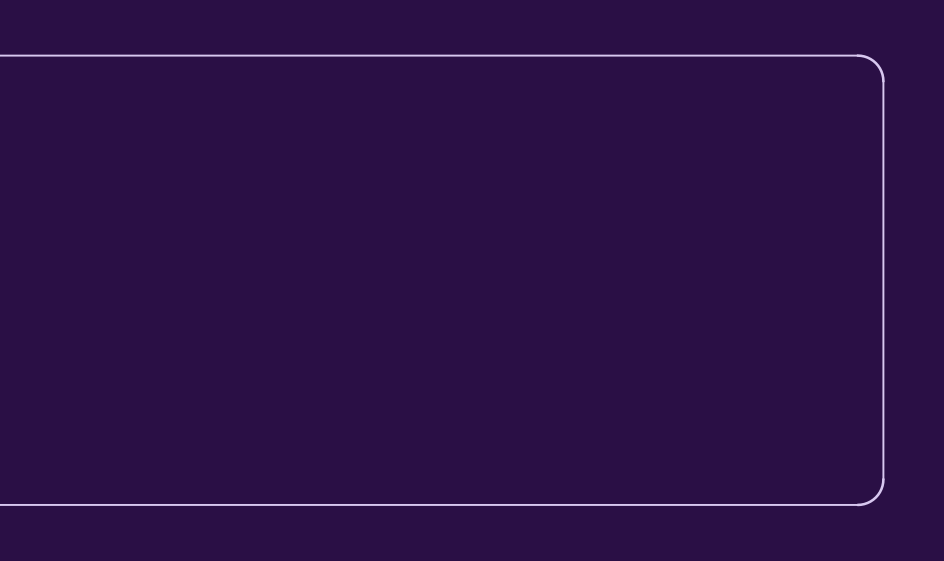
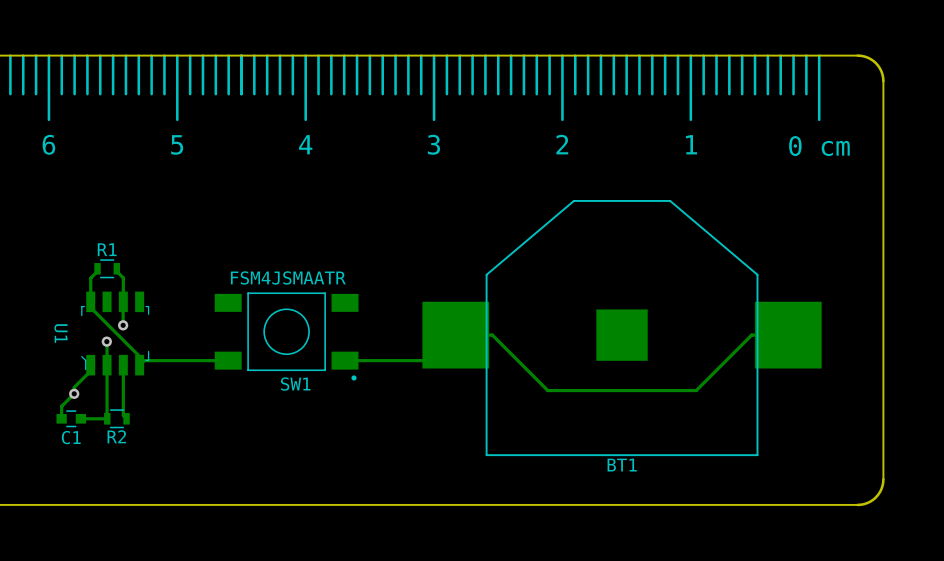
line: none -> (10, 55) (10, 94)
line: none -> (23, 55) (23, 94)
line: none -> (36, 55) (36, 94)
line: none -> (48, 55) (48, 119)
line: none -> (61, 55) (61, 94)
line: none -> (74, 55) (74, 94)
line: none -> (87, 55) (87, 94)
line: none -> (100, 55) (100, 94)
line: none -> (113, 55) (113, 94)
line: none -> (125, 55) (125, 94)
line: none -> (138, 55) (138, 94)
line: none -> (151, 55) (151, 94)
line: none -> (164, 55) (164, 94)
line: none -> (177, 55) (177, 119)
line: none -> (190, 55) (190, 94)
line: none -> (202, 55) (202, 94)
line: none -> (215, 55) (215, 94)
line: none -> (228, 55) (228, 94)
line: none -> (241, 55) (241, 94)
line: none -> (254, 55) (254, 94)
line: none -> (267, 55) (267, 94)
line: none -> (280, 55) (280, 94)
line: none -> (292, 55) (292, 94)
line: none -> (305, 55) (305, 119)
line: none -> (318, 55) (318, 94)
line: none -> (331, 55) (331, 94)
line: none -> (344, 55) (344, 94)
line: none -> (357, 55) (357, 94)
line: none -> (369, 55) (369, 94)
line: none -> (382, 55) (382, 94)
line: none -> (395, 55) (395, 94)
line: none -> (408, 55) (408, 94)
line: none -> (421, 55) (421, 94)
line: none -> (434, 55) (434, 119)
line: none -> (446, 55) (446, 94)
line: none -> (459, 55) (459, 94)
line: none -> (472, 55) (472, 94)
line: none -> (485, 55) (485, 94)
line: none -> (498, 55) (498, 94)
line: none -> (511, 55) (511, 94)
line: none -> (523, 55) (523, 94)
line: none -> (536, 55) (536, 94)
line: none -> (549, 55) (549, 94)
line: none -> (562, 55) (562, 119)
line: none -> (575, 55) (575, 94)
line: none -> (588, 55) (588, 94)
line: none -> (600, 55) (600, 94)
line: none -> (613, 55) (613, 94)
line: none -> (626, 55) (626, 94)
line: none -> (639, 55) (639, 94)
line: none -> (652, 55) (652, 94)
line: none -> (665, 55) (665, 94)
line: none -> (677, 55) (677, 94)
line: none -> (690, 55) (690, 119)
line: none -> (703, 55) (703, 94)
line: none -> (716, 55) (716, 94)
line: none -> (729, 55) (729, 94)
line: none -> (742, 55) (742, 94)
line: none -> (755, 55) (755, 94)
line: none -> (767, 55) (767, 94)
line: none -> (780, 55) (780, 94)
line: none -> (793, 55) (793, 94)
line: none -> (806, 55) (806, 94)
line: none -> (819, 55) (819, 119)
text: none -> 6 (48, 144)
text: none -> 5 (177, 144)
text: none -> 4 (305, 144)
text: none -> 3 (433, 144)
text: none -> 2 (562, 144)
text: none -> 1 (691, 144)
text: none -> 0 cm (819, 146)
track: none -> (97, 268) (97, 271) (90, 278) (90, 307) (139, 356) (139, 365) (144, 360) (228, 360)
R1: none -> (107, 268)
track: none -> (116, 268) (123, 277) (123, 325)
via: none -> (123, 325)
BT1: none -> (622, 328)
U1: none -> (115, 333)
track: none -> (788, 335) (751, 335) (696, 390) (547, 390) (492, 335) (455, 335) (430, 360) (345, 360)
SW1: none -> FSM4JSMAATR (286, 336)
track: none -> (106, 341) (107, 418) (80, 418)
via: none -> (106, 341)
track: none -> (90, 365) (90, 370) (74, 387) (74, 393) (61, 406) (61, 418)
track: none -> (123, 365) (123, 415) (126, 418)
via: none -> (74, 393)
C1: none -> (71, 418)
R2: none -> (116, 418)

